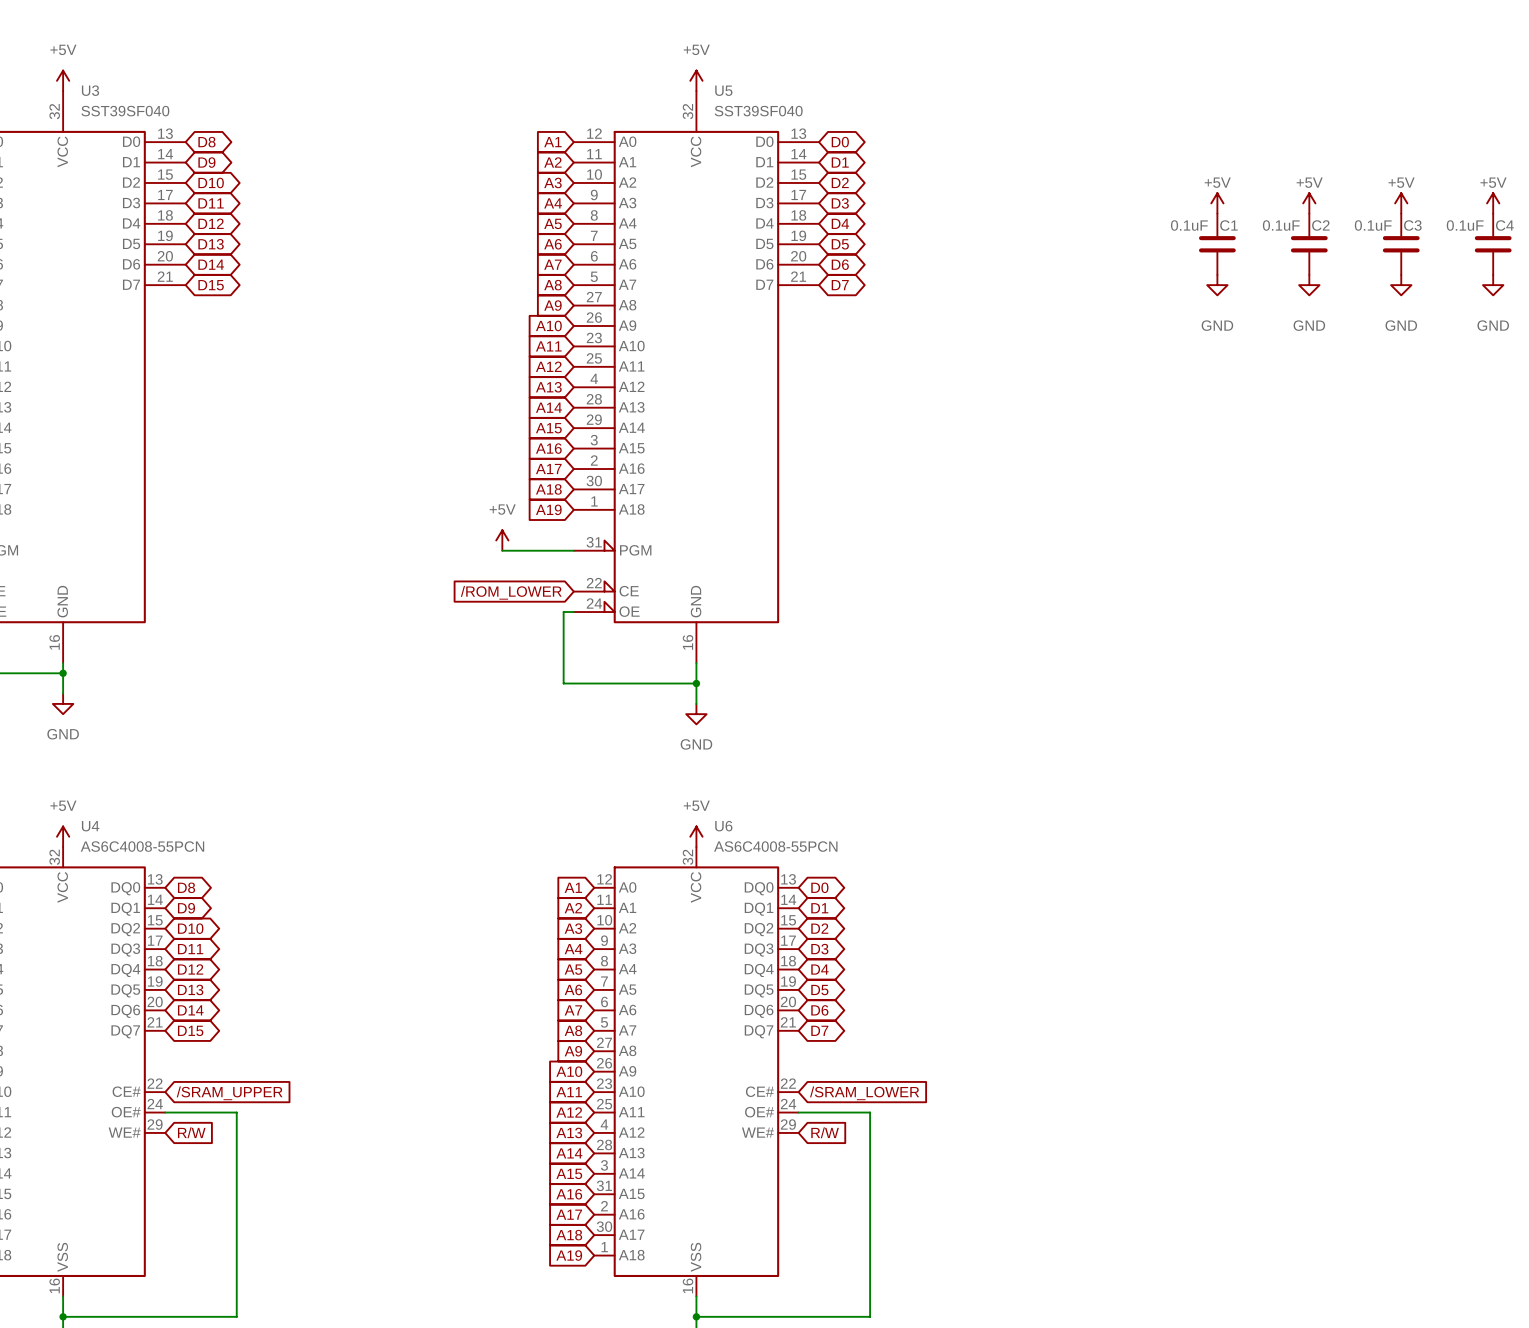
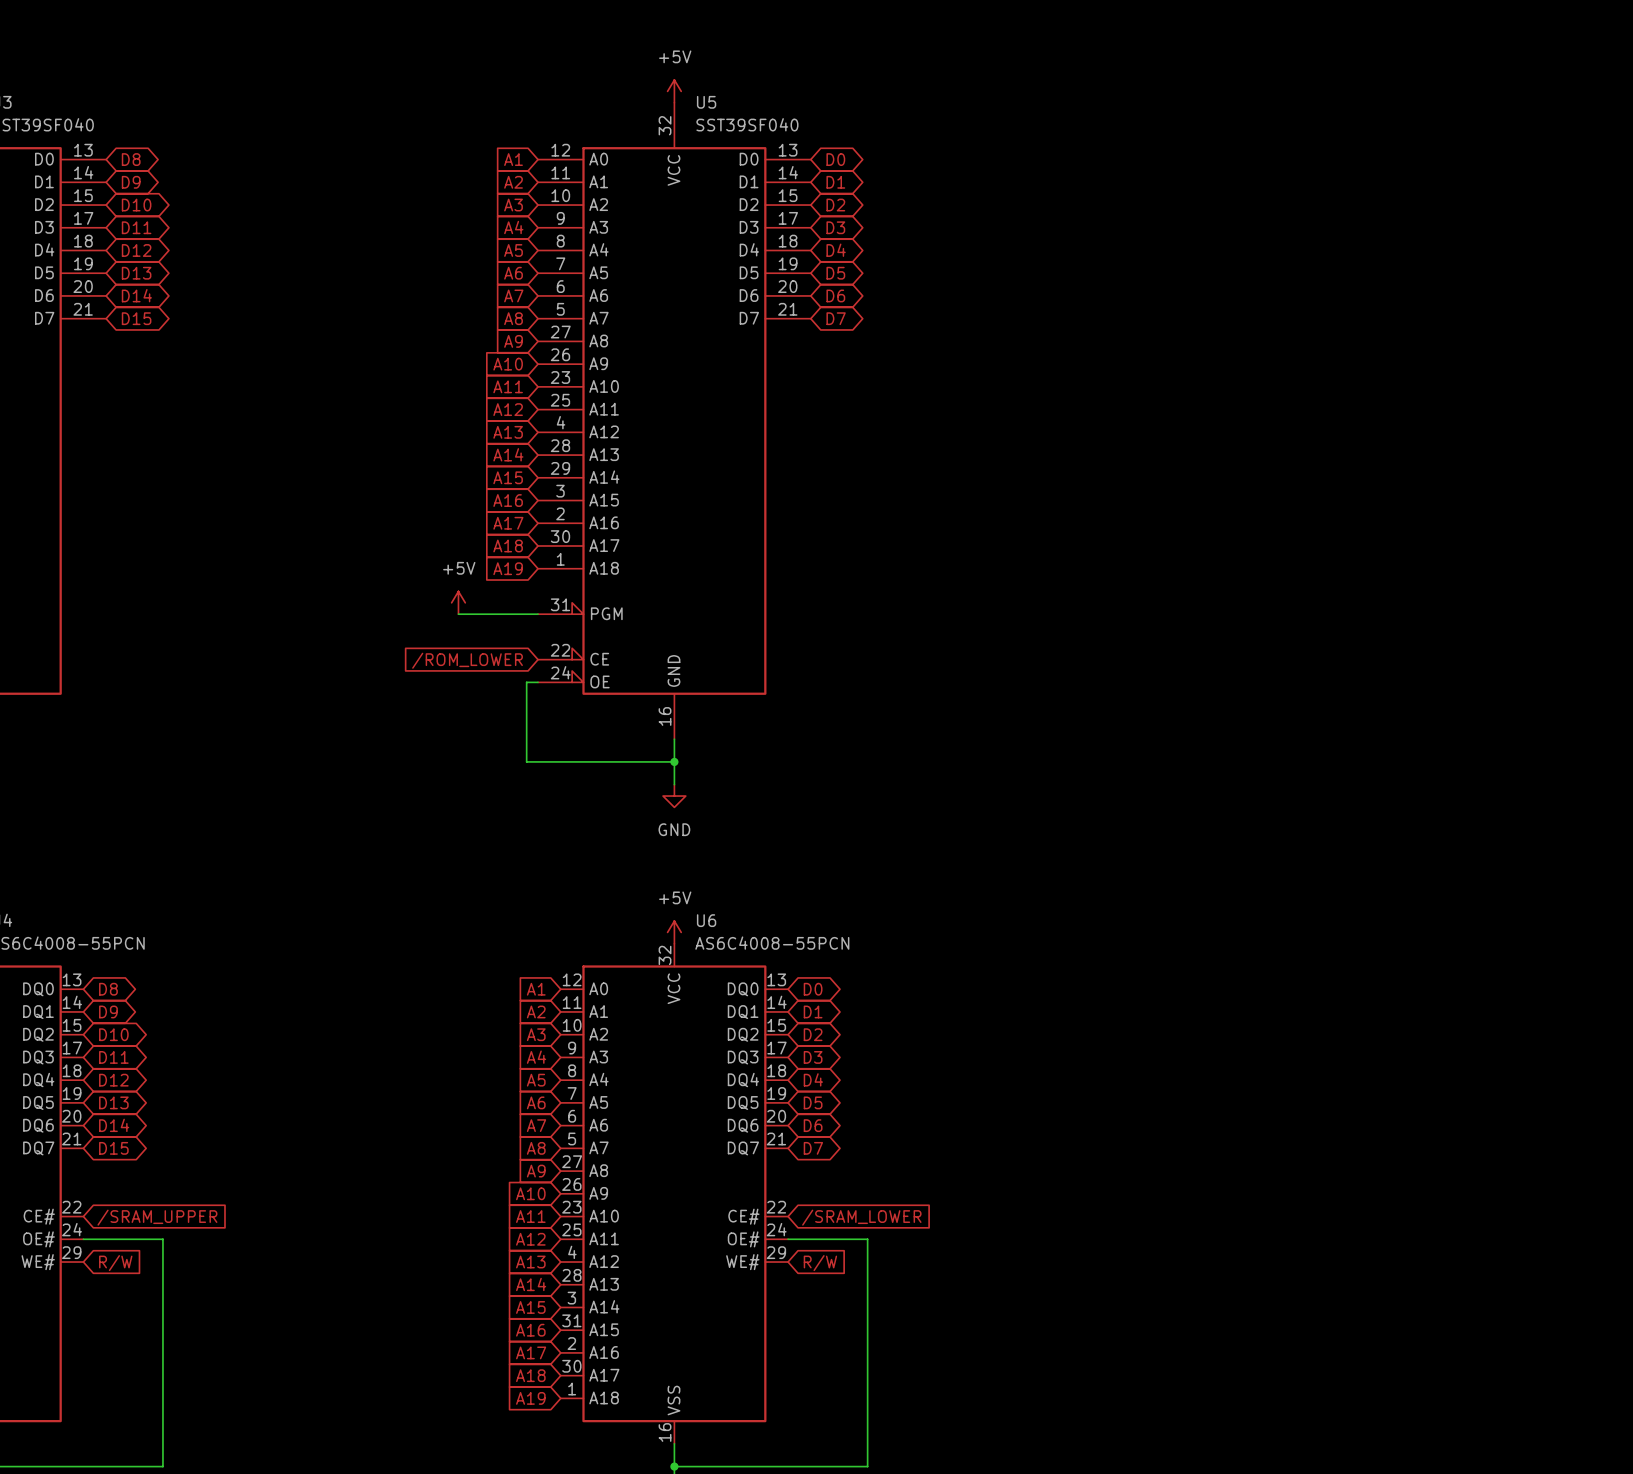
power symbol: +5V (1217, 203) -> none
power symbol: +5V (1309, 203) -> none
power symbol: +5V (1401, 203) -> none
power symbol: +5V (1493, 203) -> none
C1: 0.1uF (1217, 244) -> none
C2: 0.1uF (1309, 244) -> none
C3: 0.1uF (1401, 244) -> none
C4: 0.1uF (1493, 244) -> none
power symbol: GND (1217, 285) -> none
power symbol: GND (1309, 285) -> none
power symbol: GND (1401, 285) -> none
power symbol: GND (1493, 285) -> none

